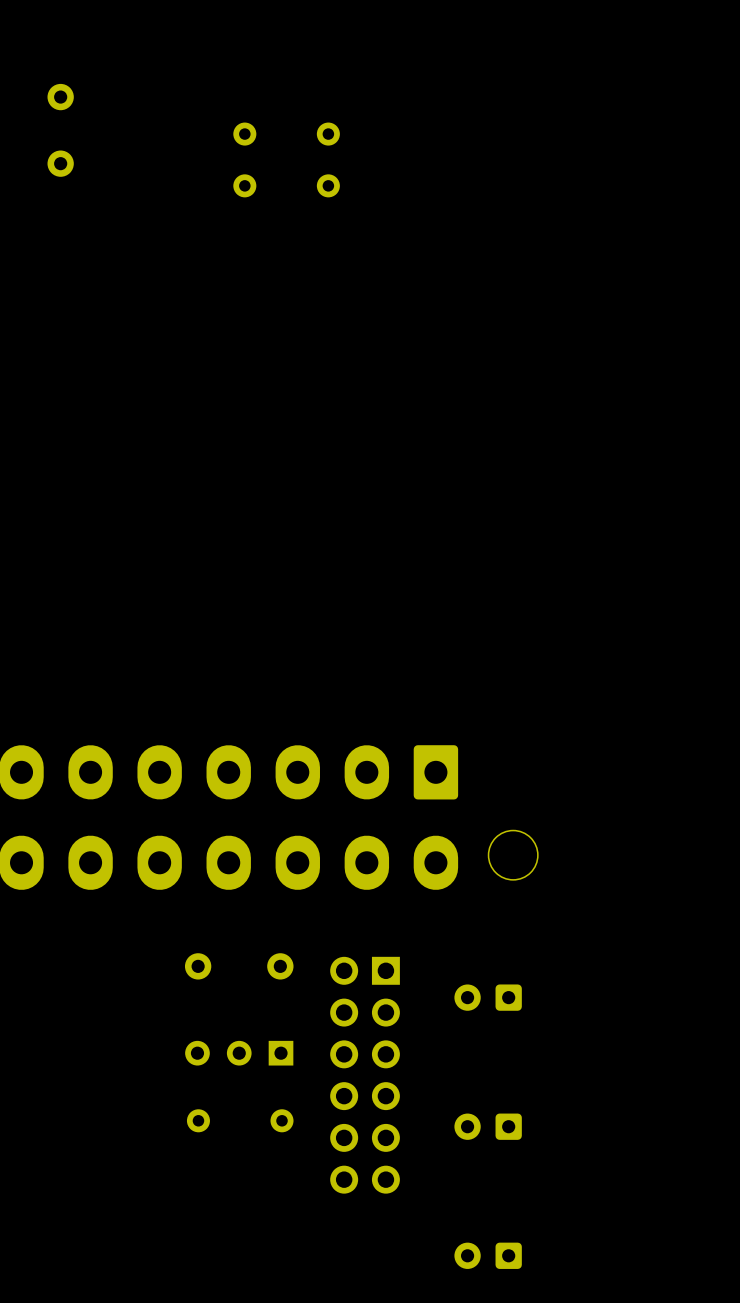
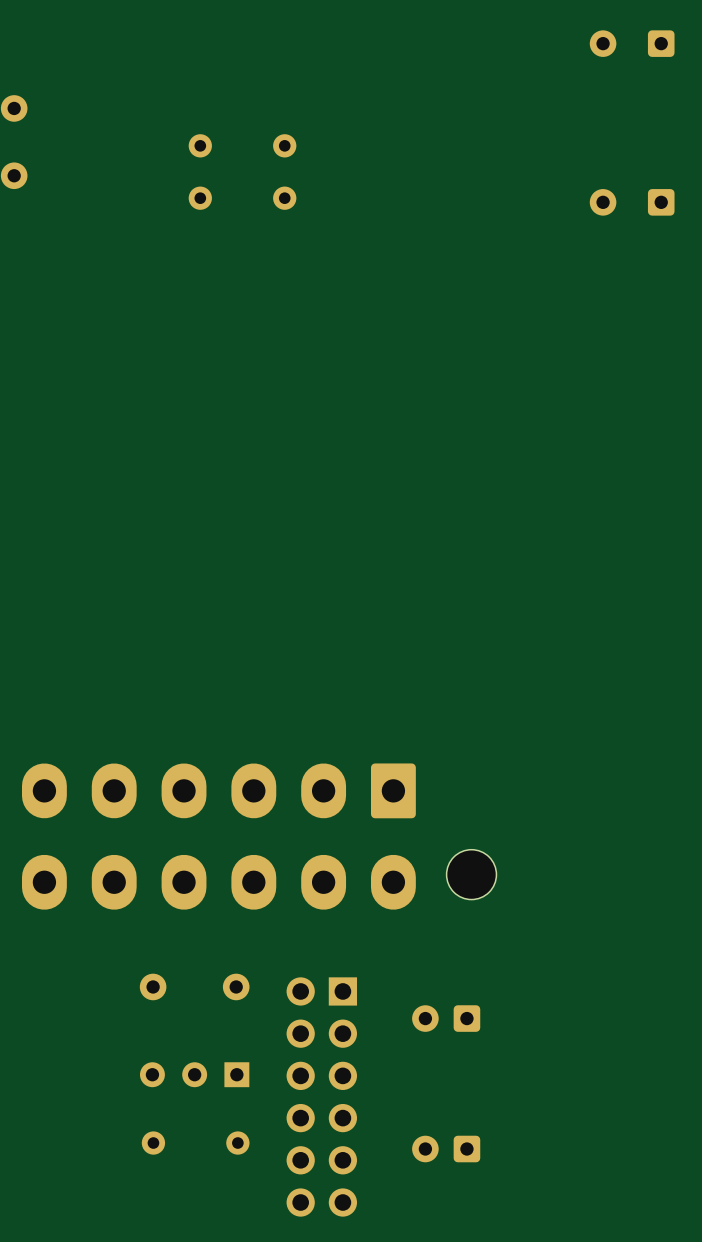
part: none -> (632, 43)
part: none -> (632, 202)

